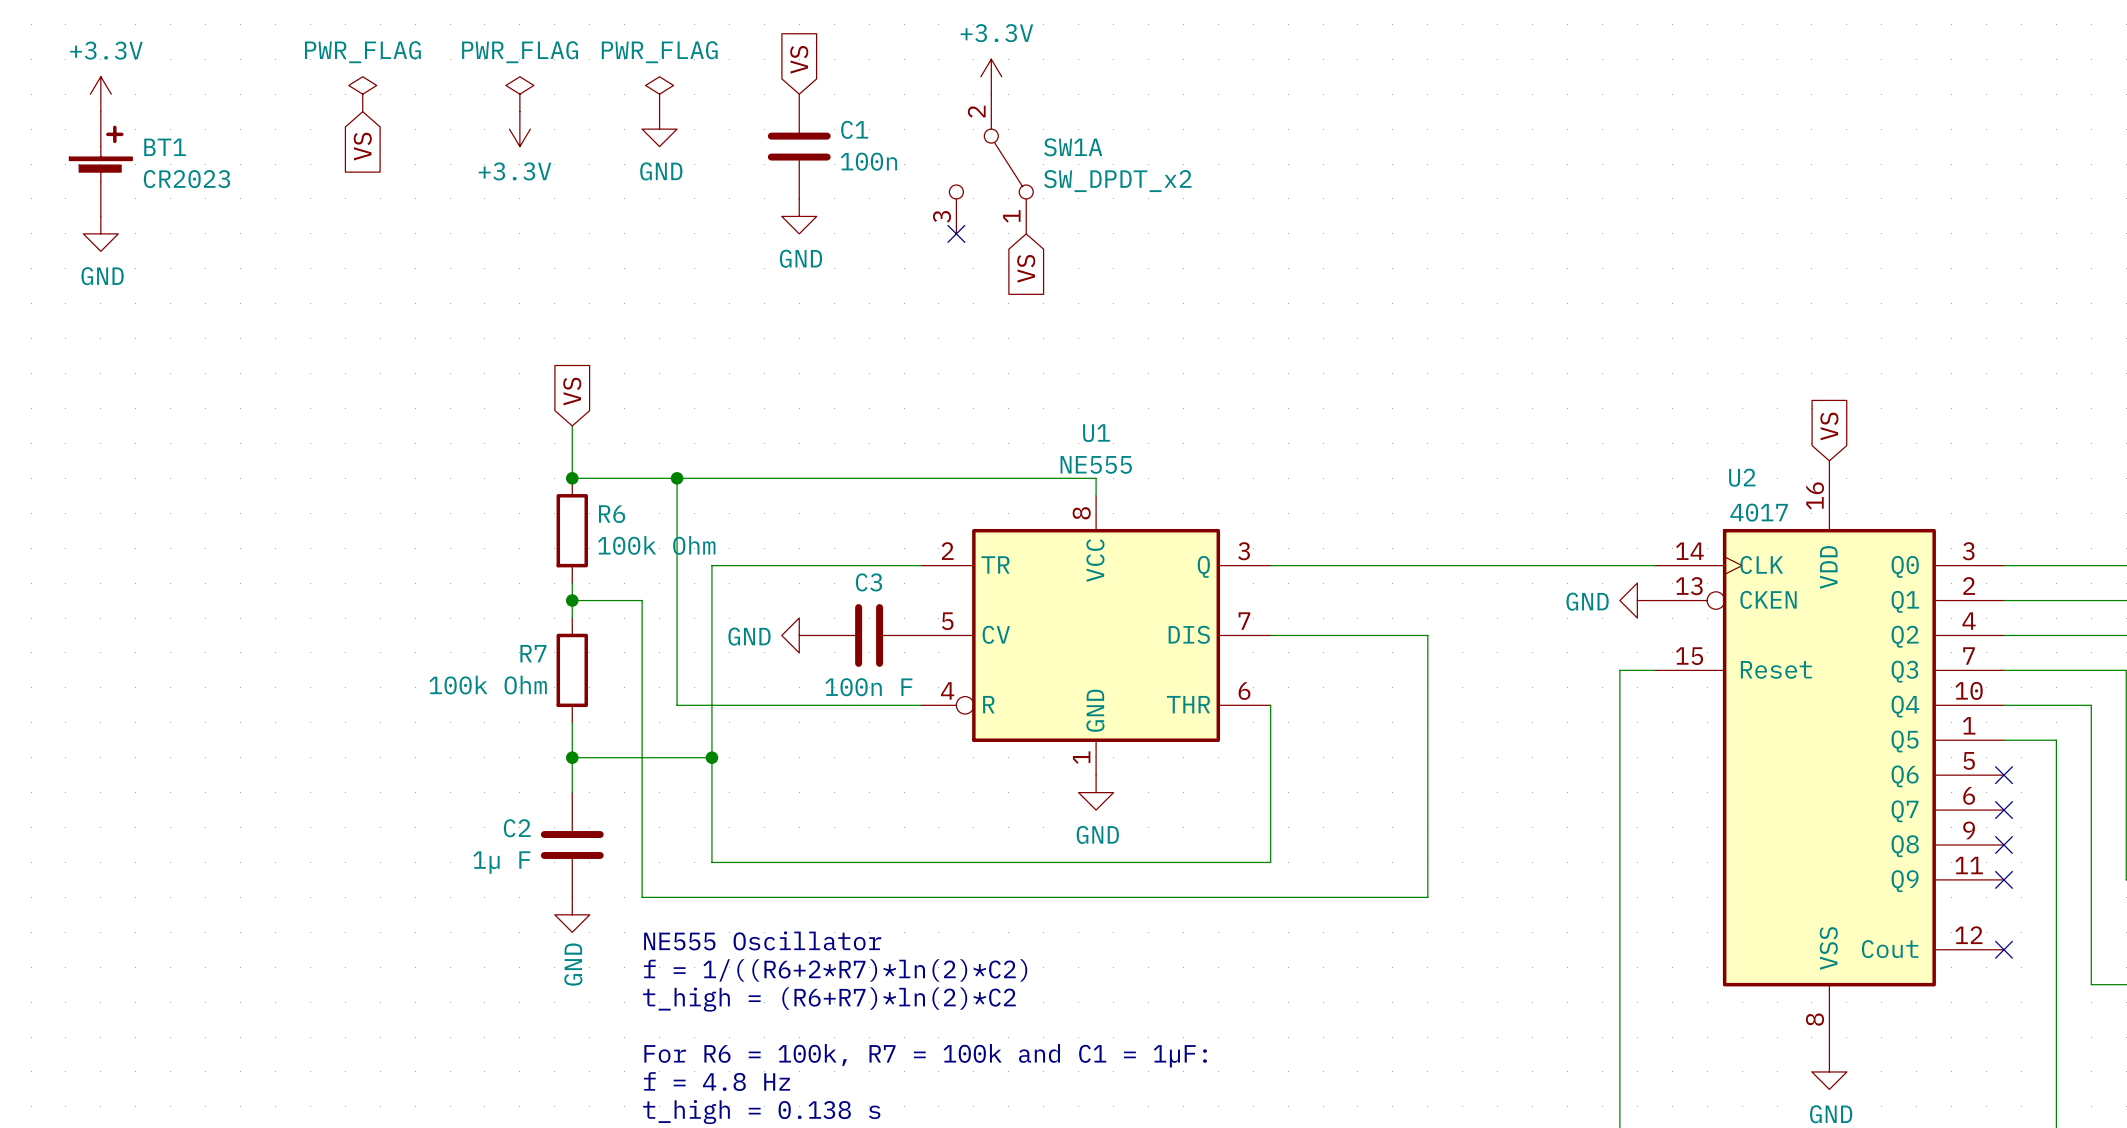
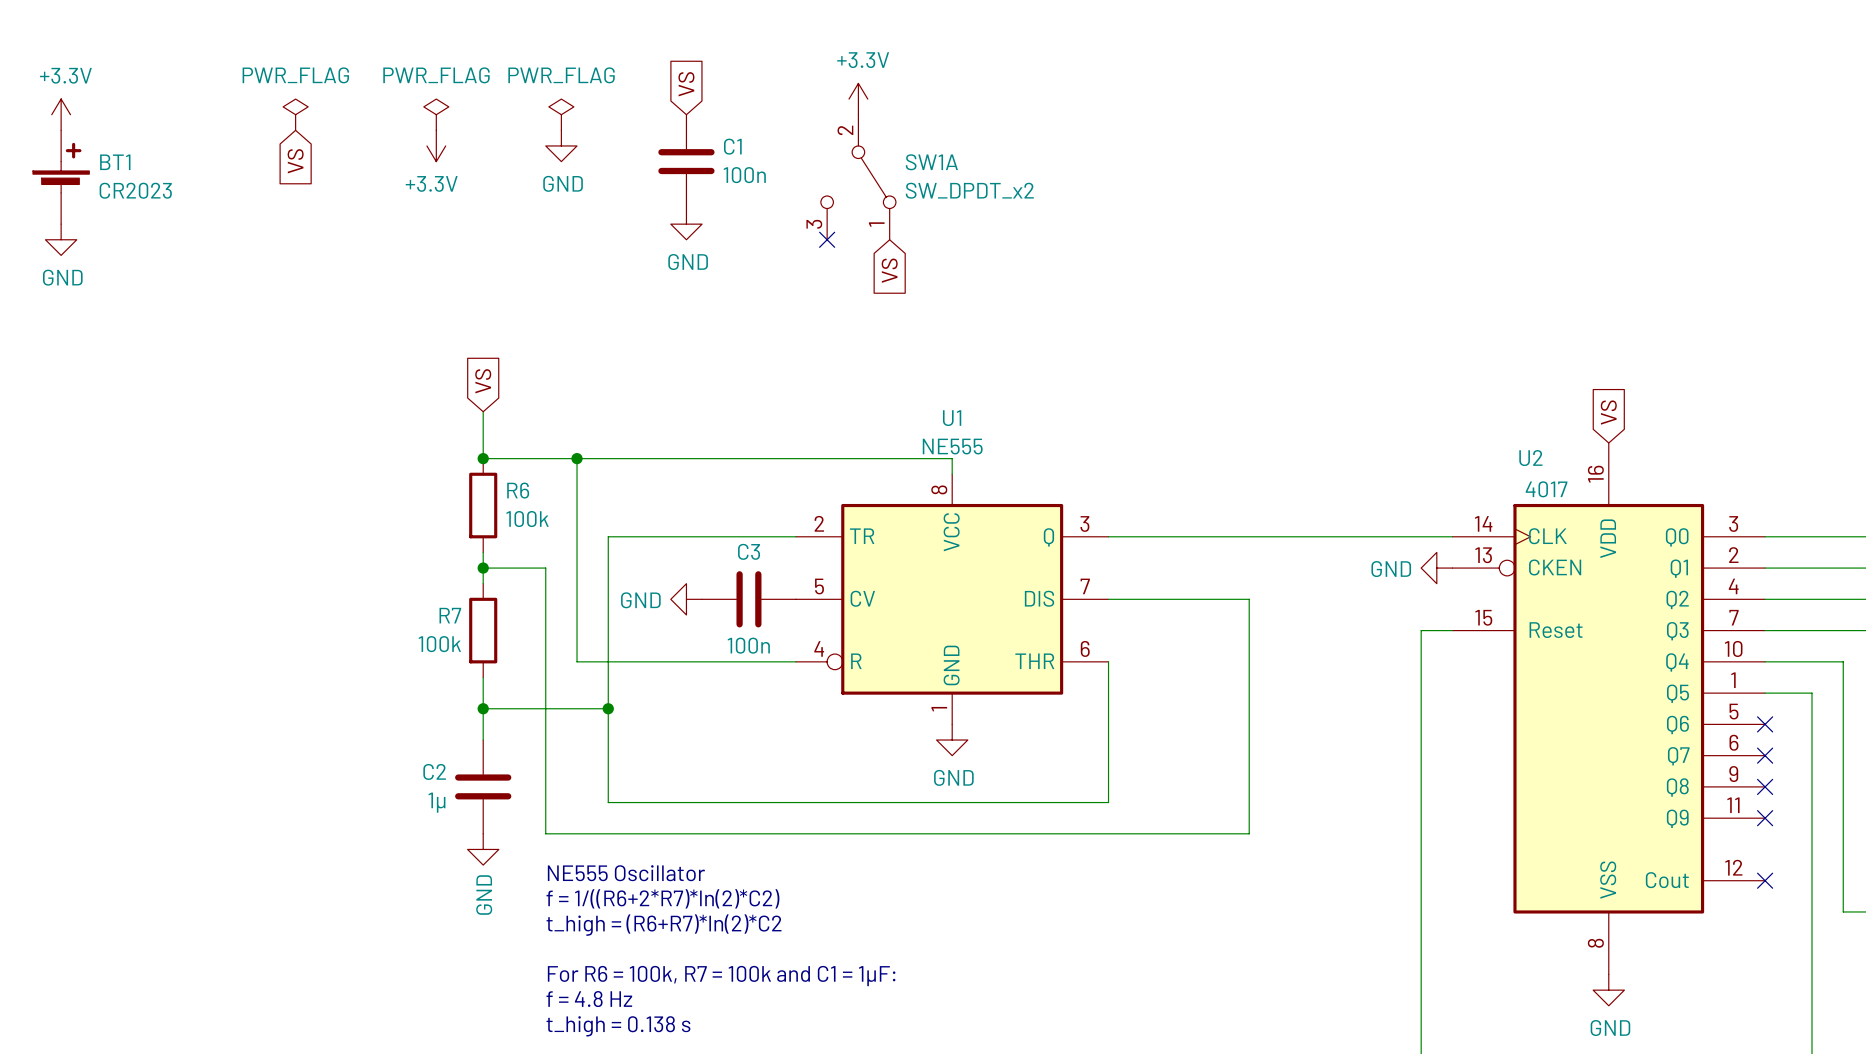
R6 value: 100k Ohm (656, 545) -> 100k (527, 519)
R7 value: 100k Ohm (488, 685) -> 100k (439, 644)
C3 value: 100n F (868, 687) -> 100n (748, 645)
C2 value: 1µ F (501, 862) -> 1µ (436, 802)

